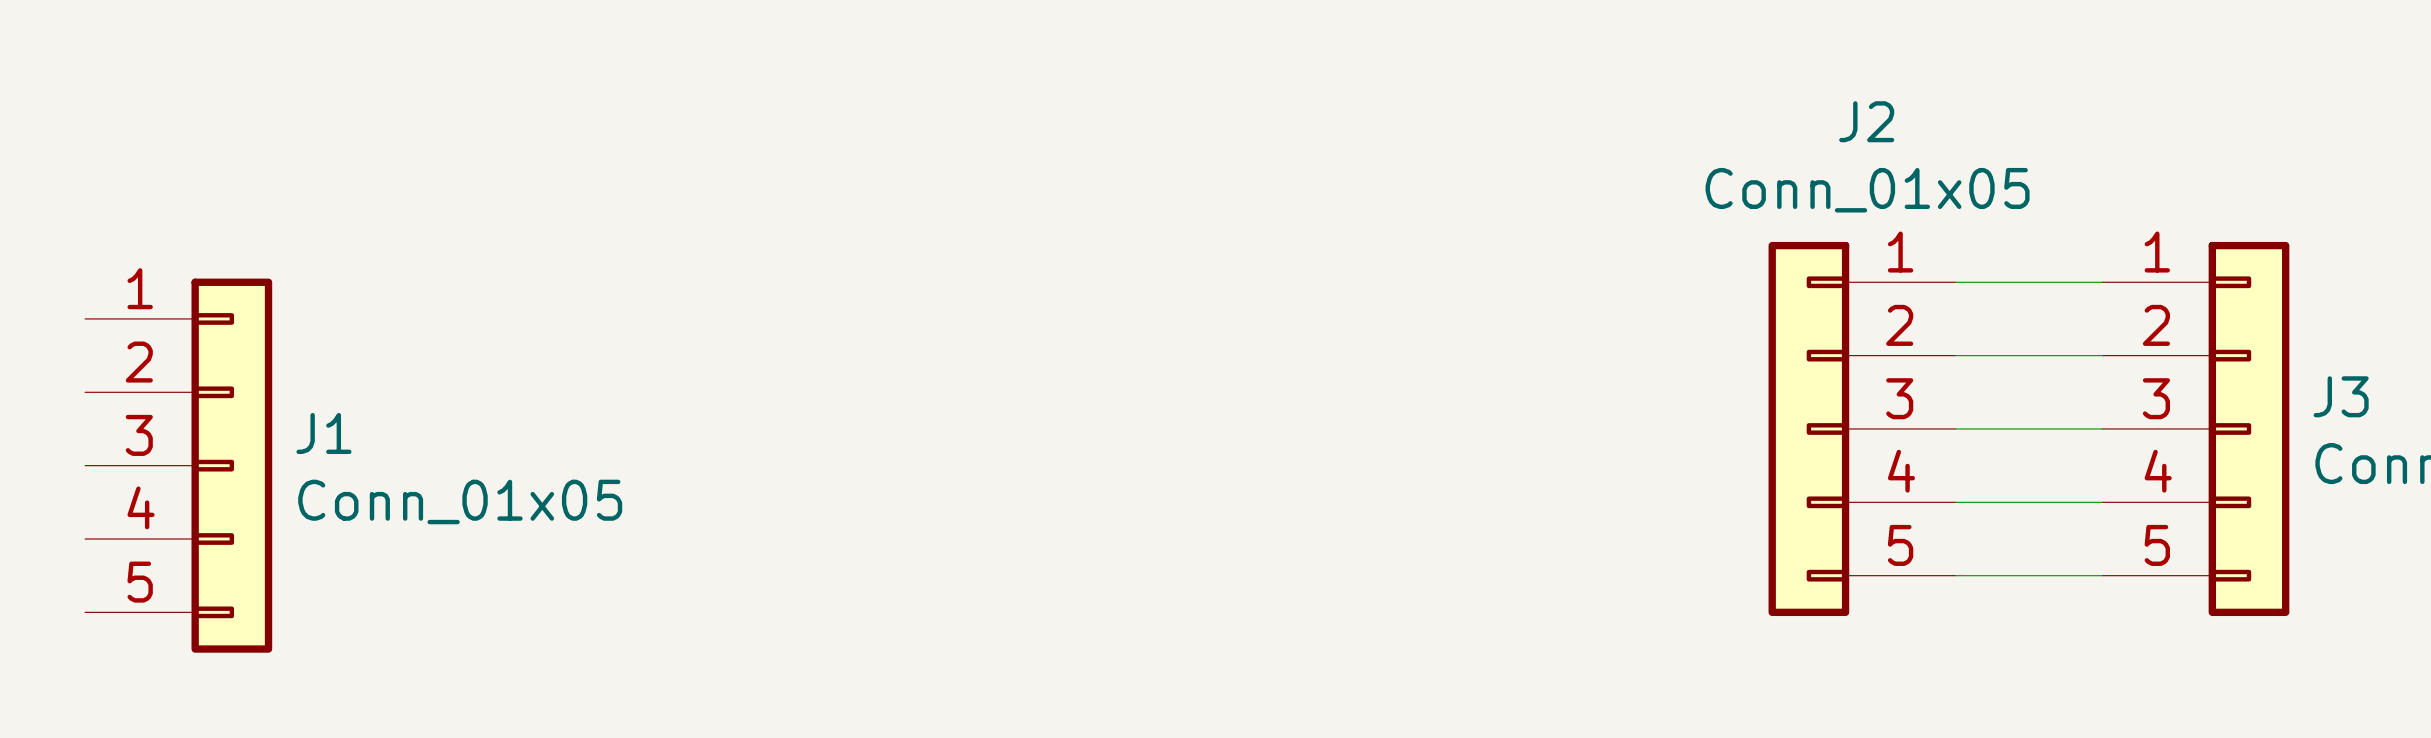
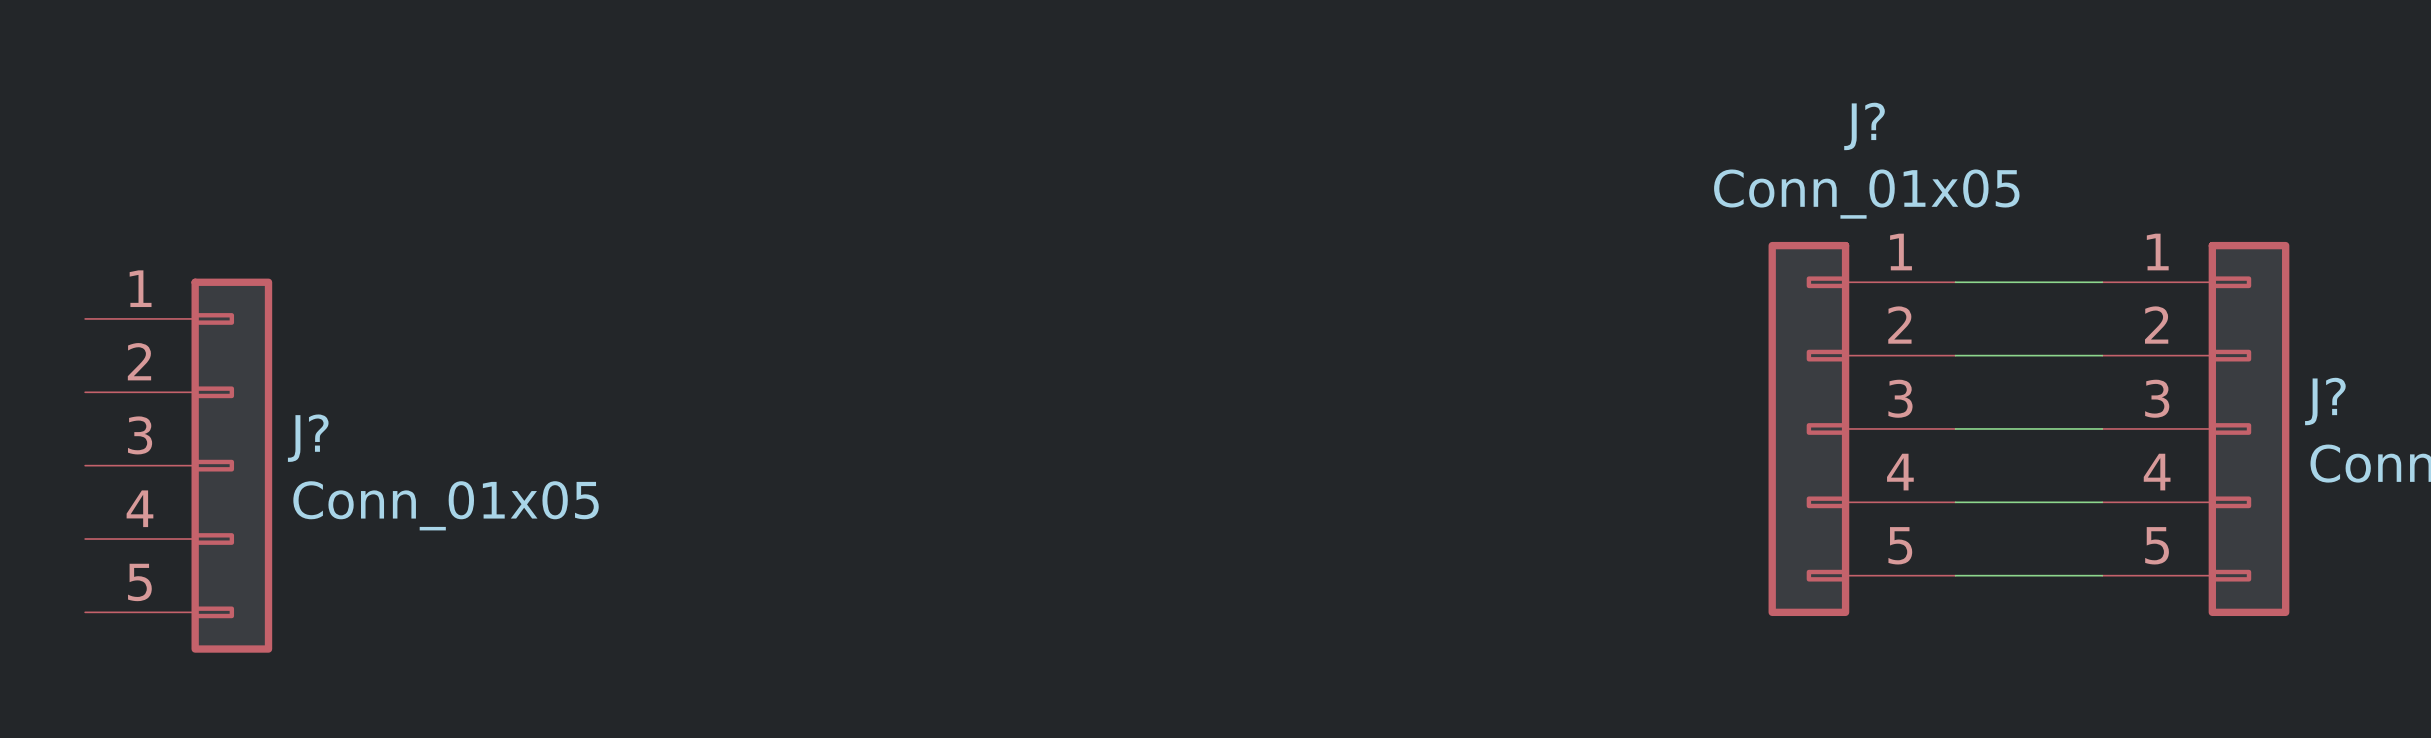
J2 name: J2 (1866, 121) -> J? (1864, 126)
J3 name: J3 (2341, 396) -> J? (2325, 401)
J1 name: J1 (323, 433) -> J? (308, 438)

